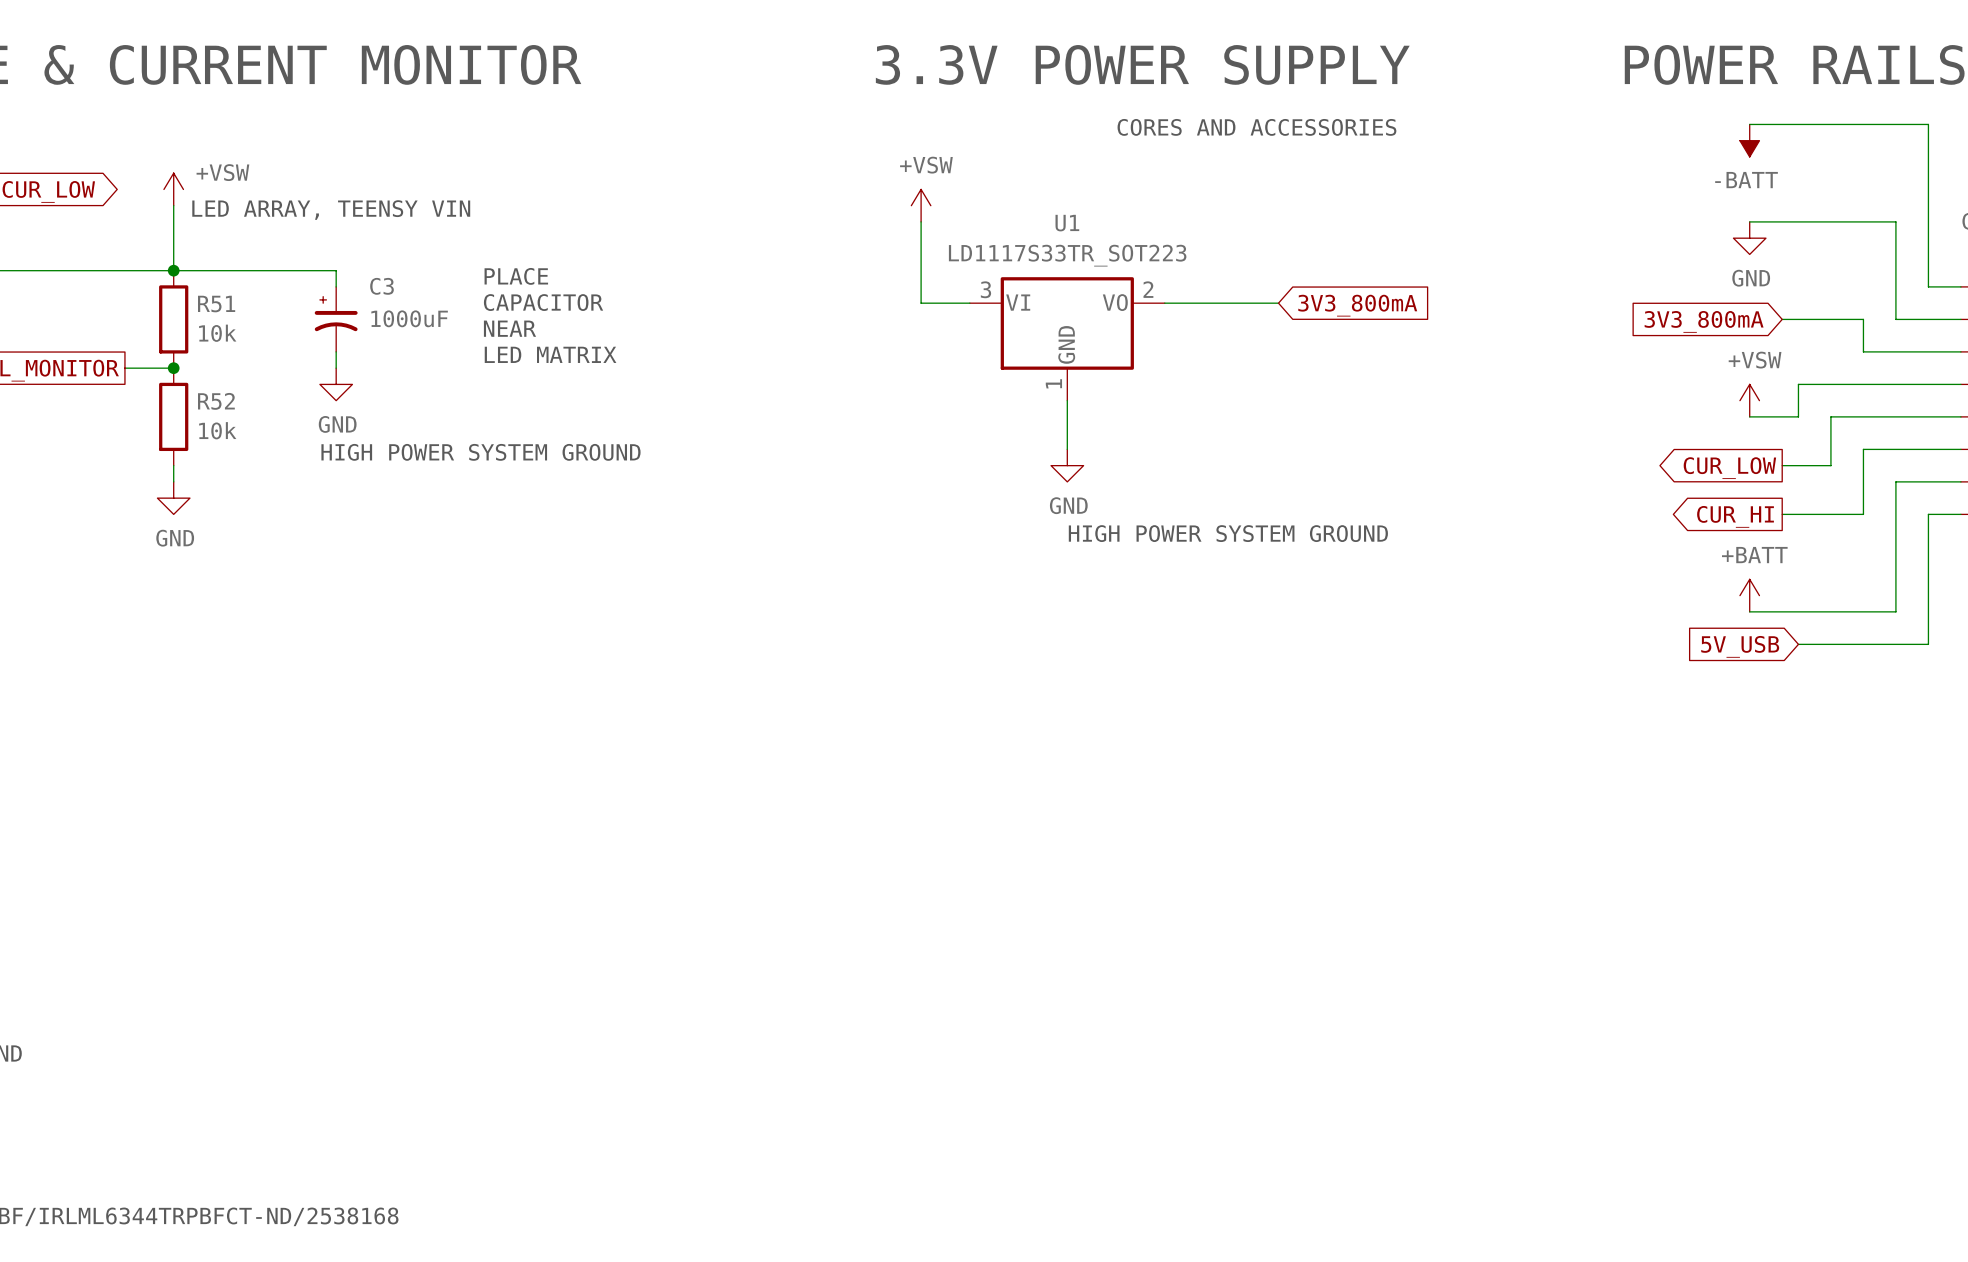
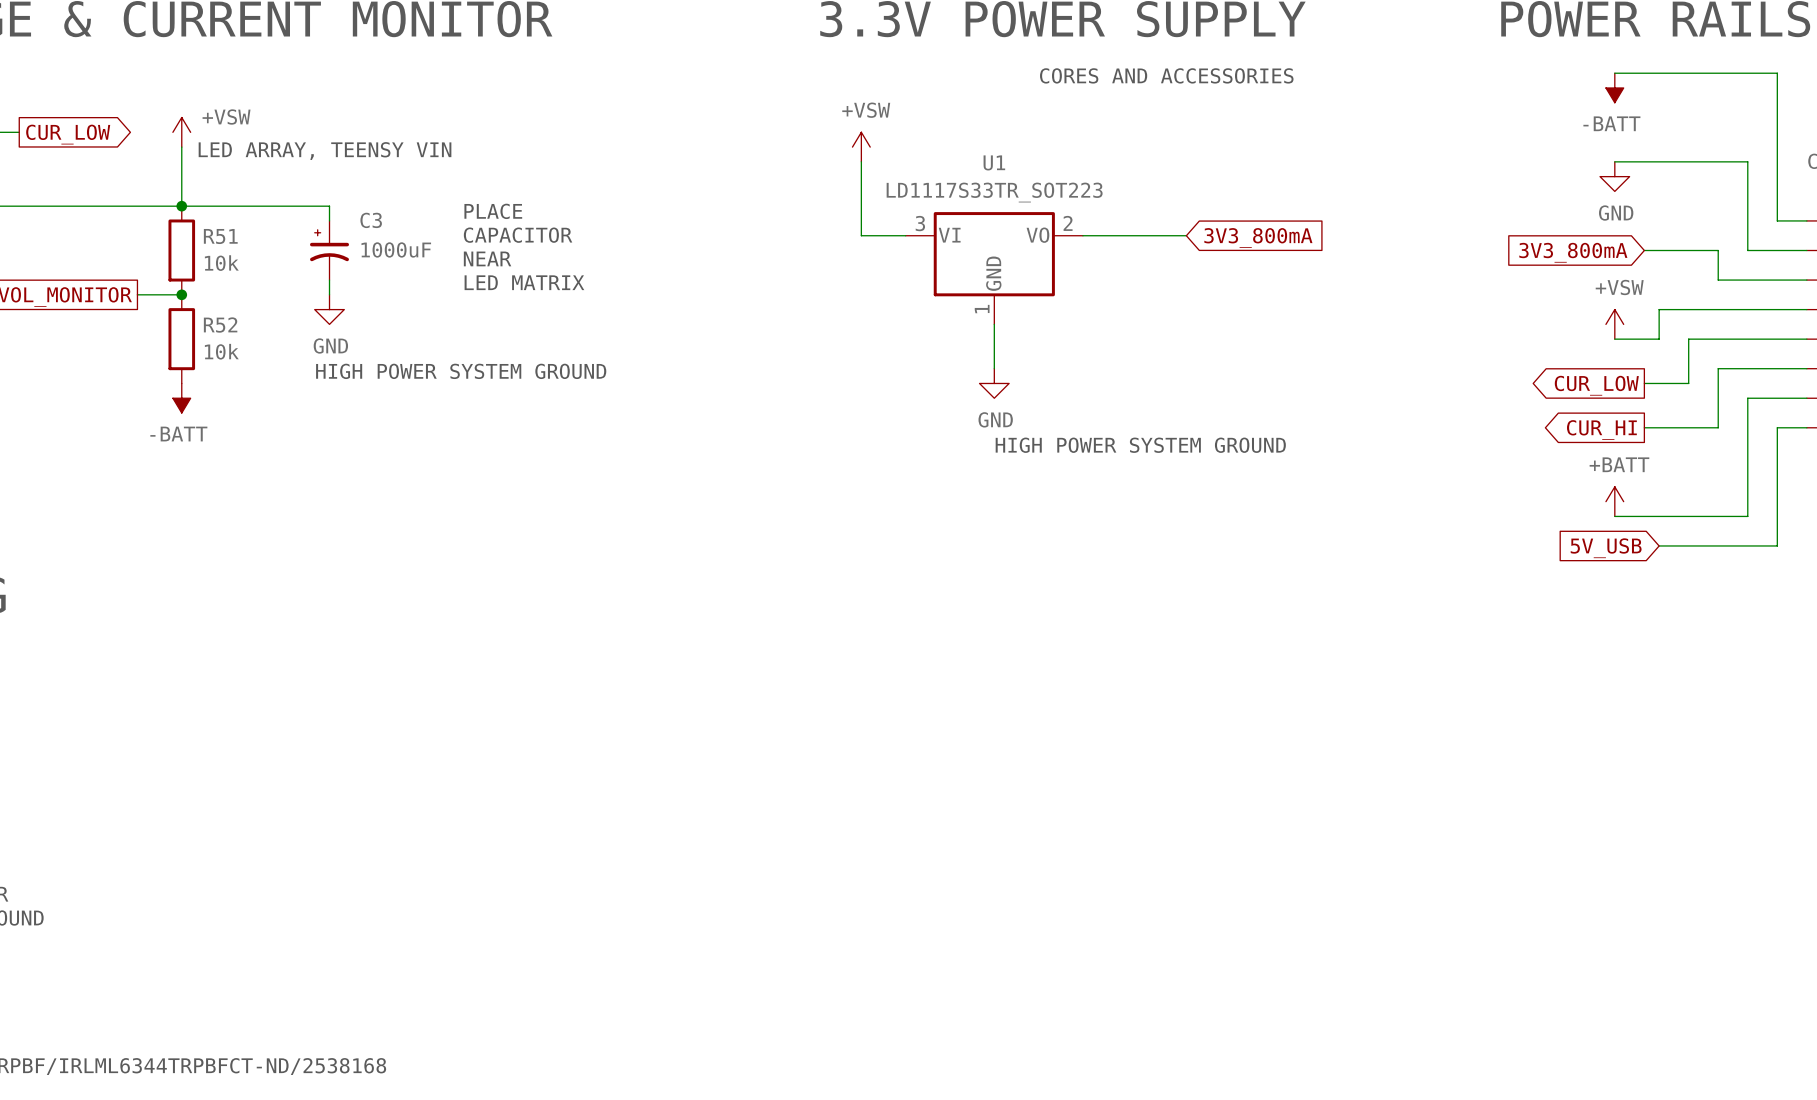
power symbol: none -> -BATT (181, 398)
power symbol: GND (173, 498) -> none

